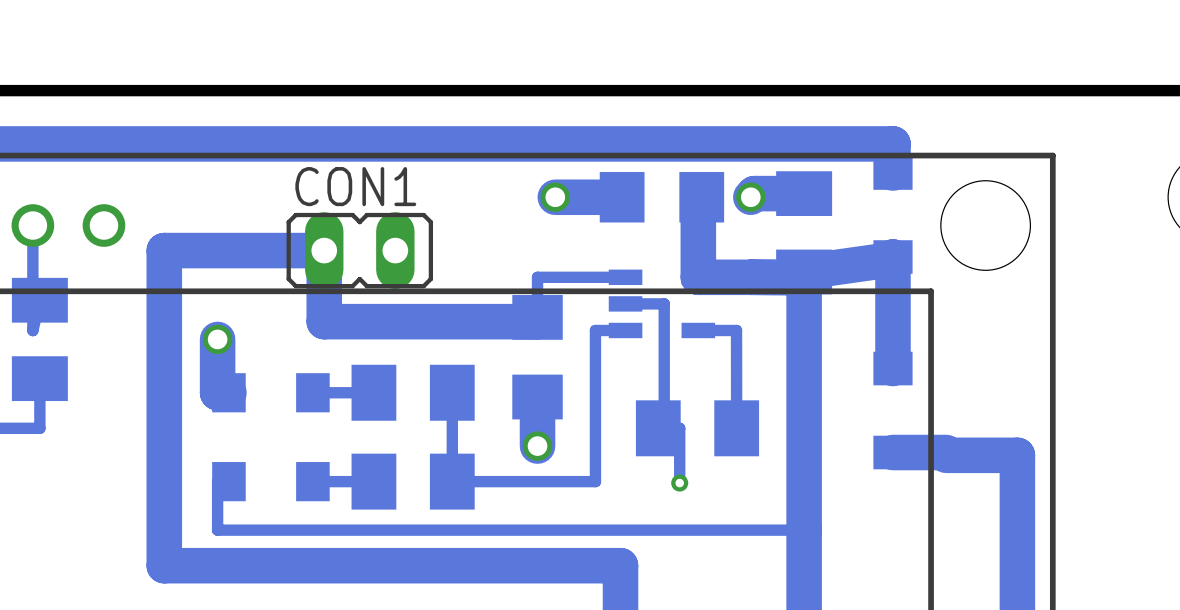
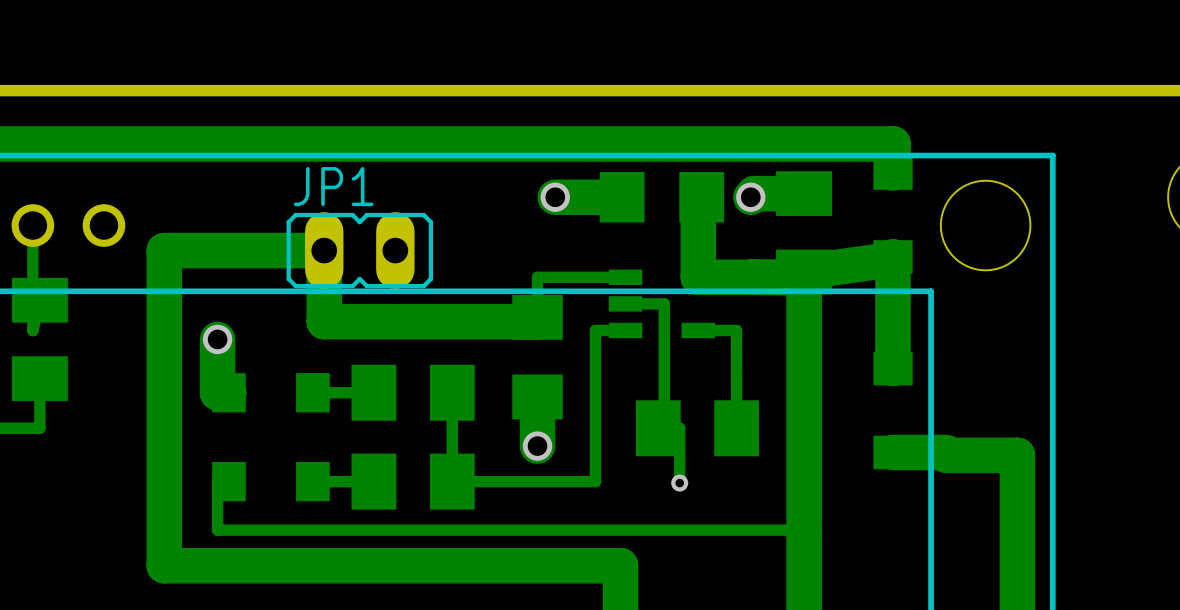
CON1 name: CON1 (355, 186) -> JP1 (333, 186)

